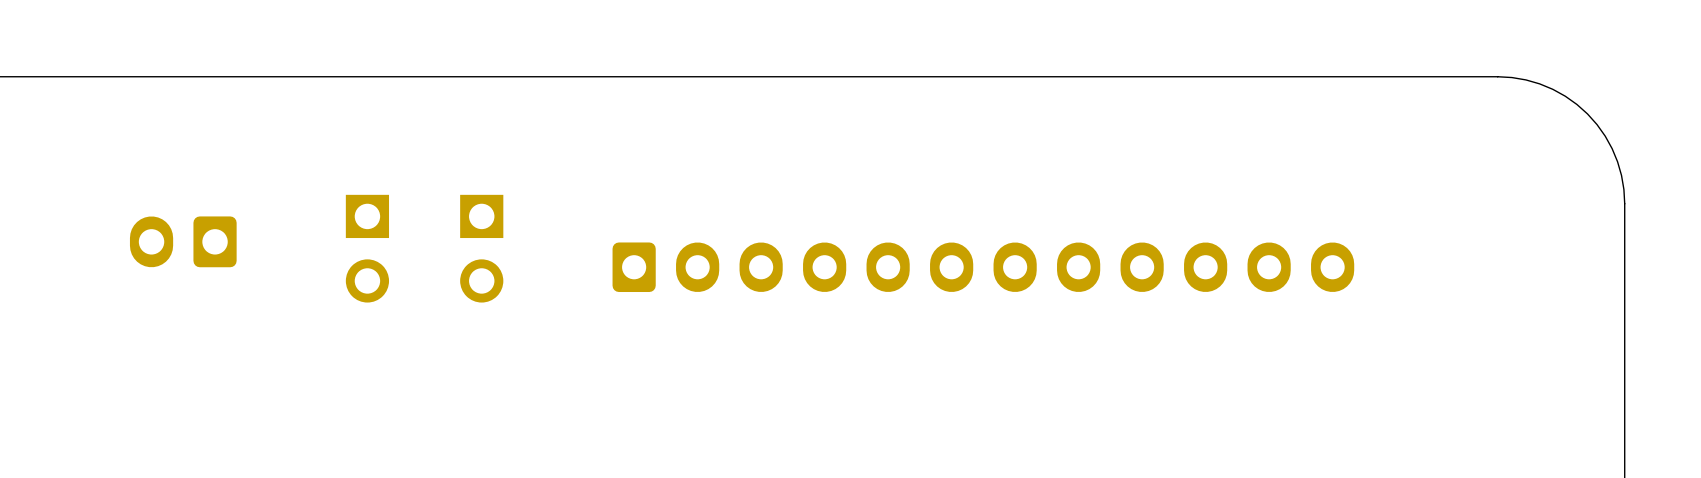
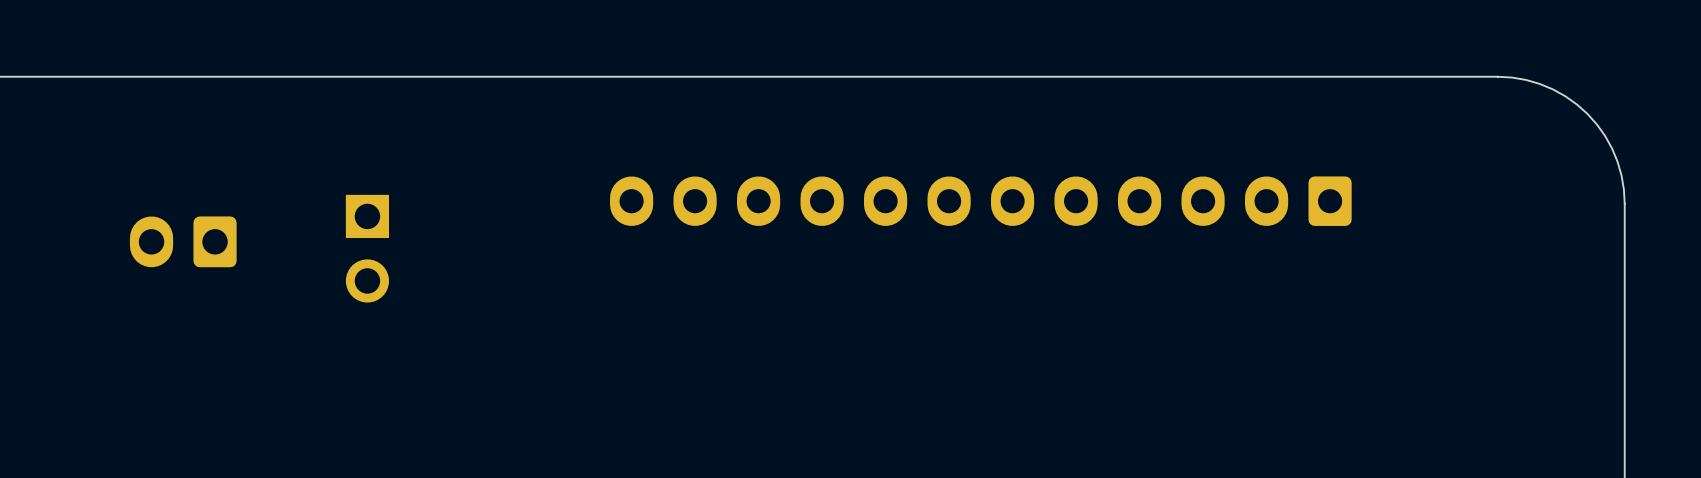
part: (481, 248) -> none
part rotation: 0° (983, 267) -> 180° (980, 201)

